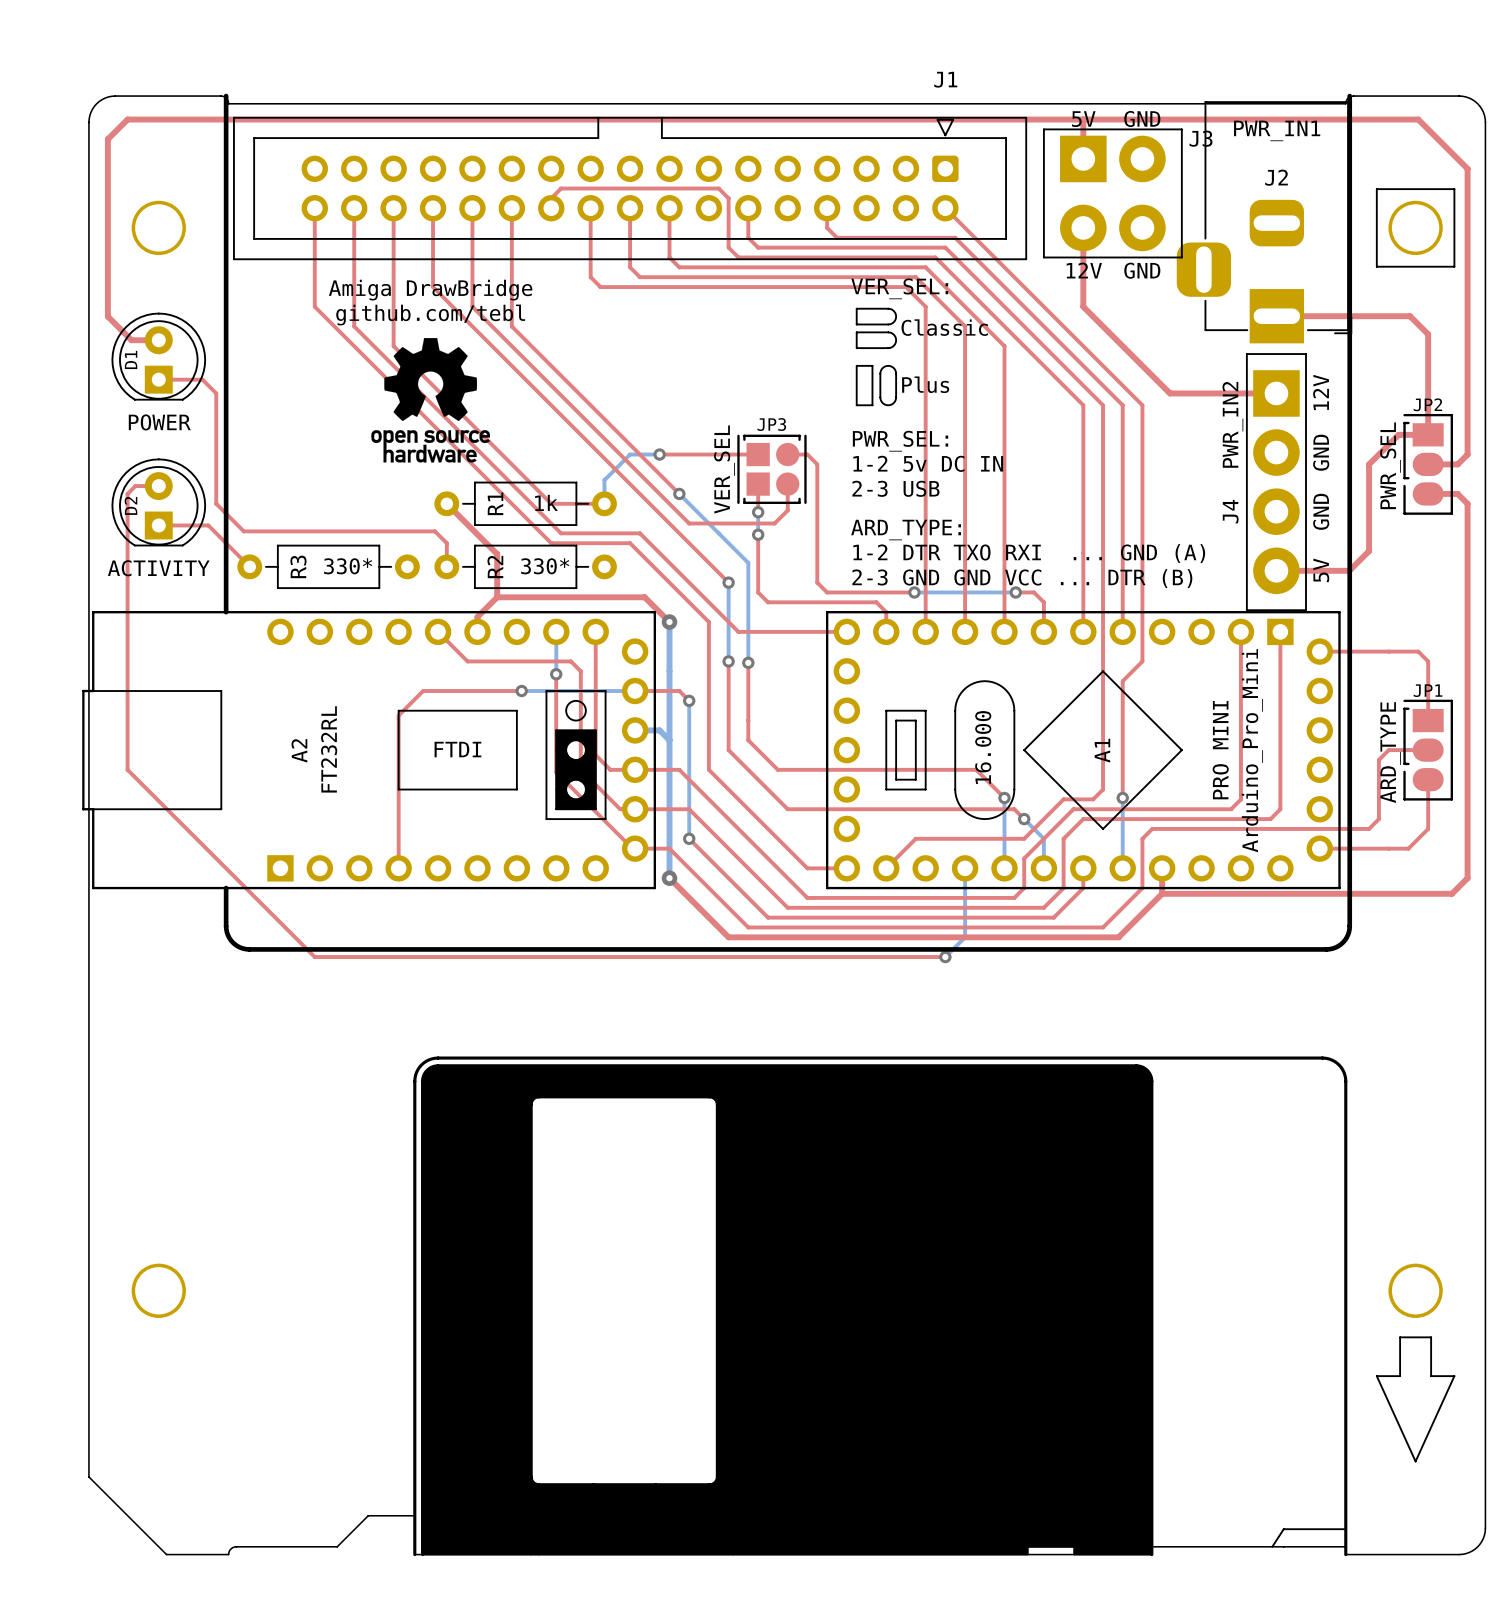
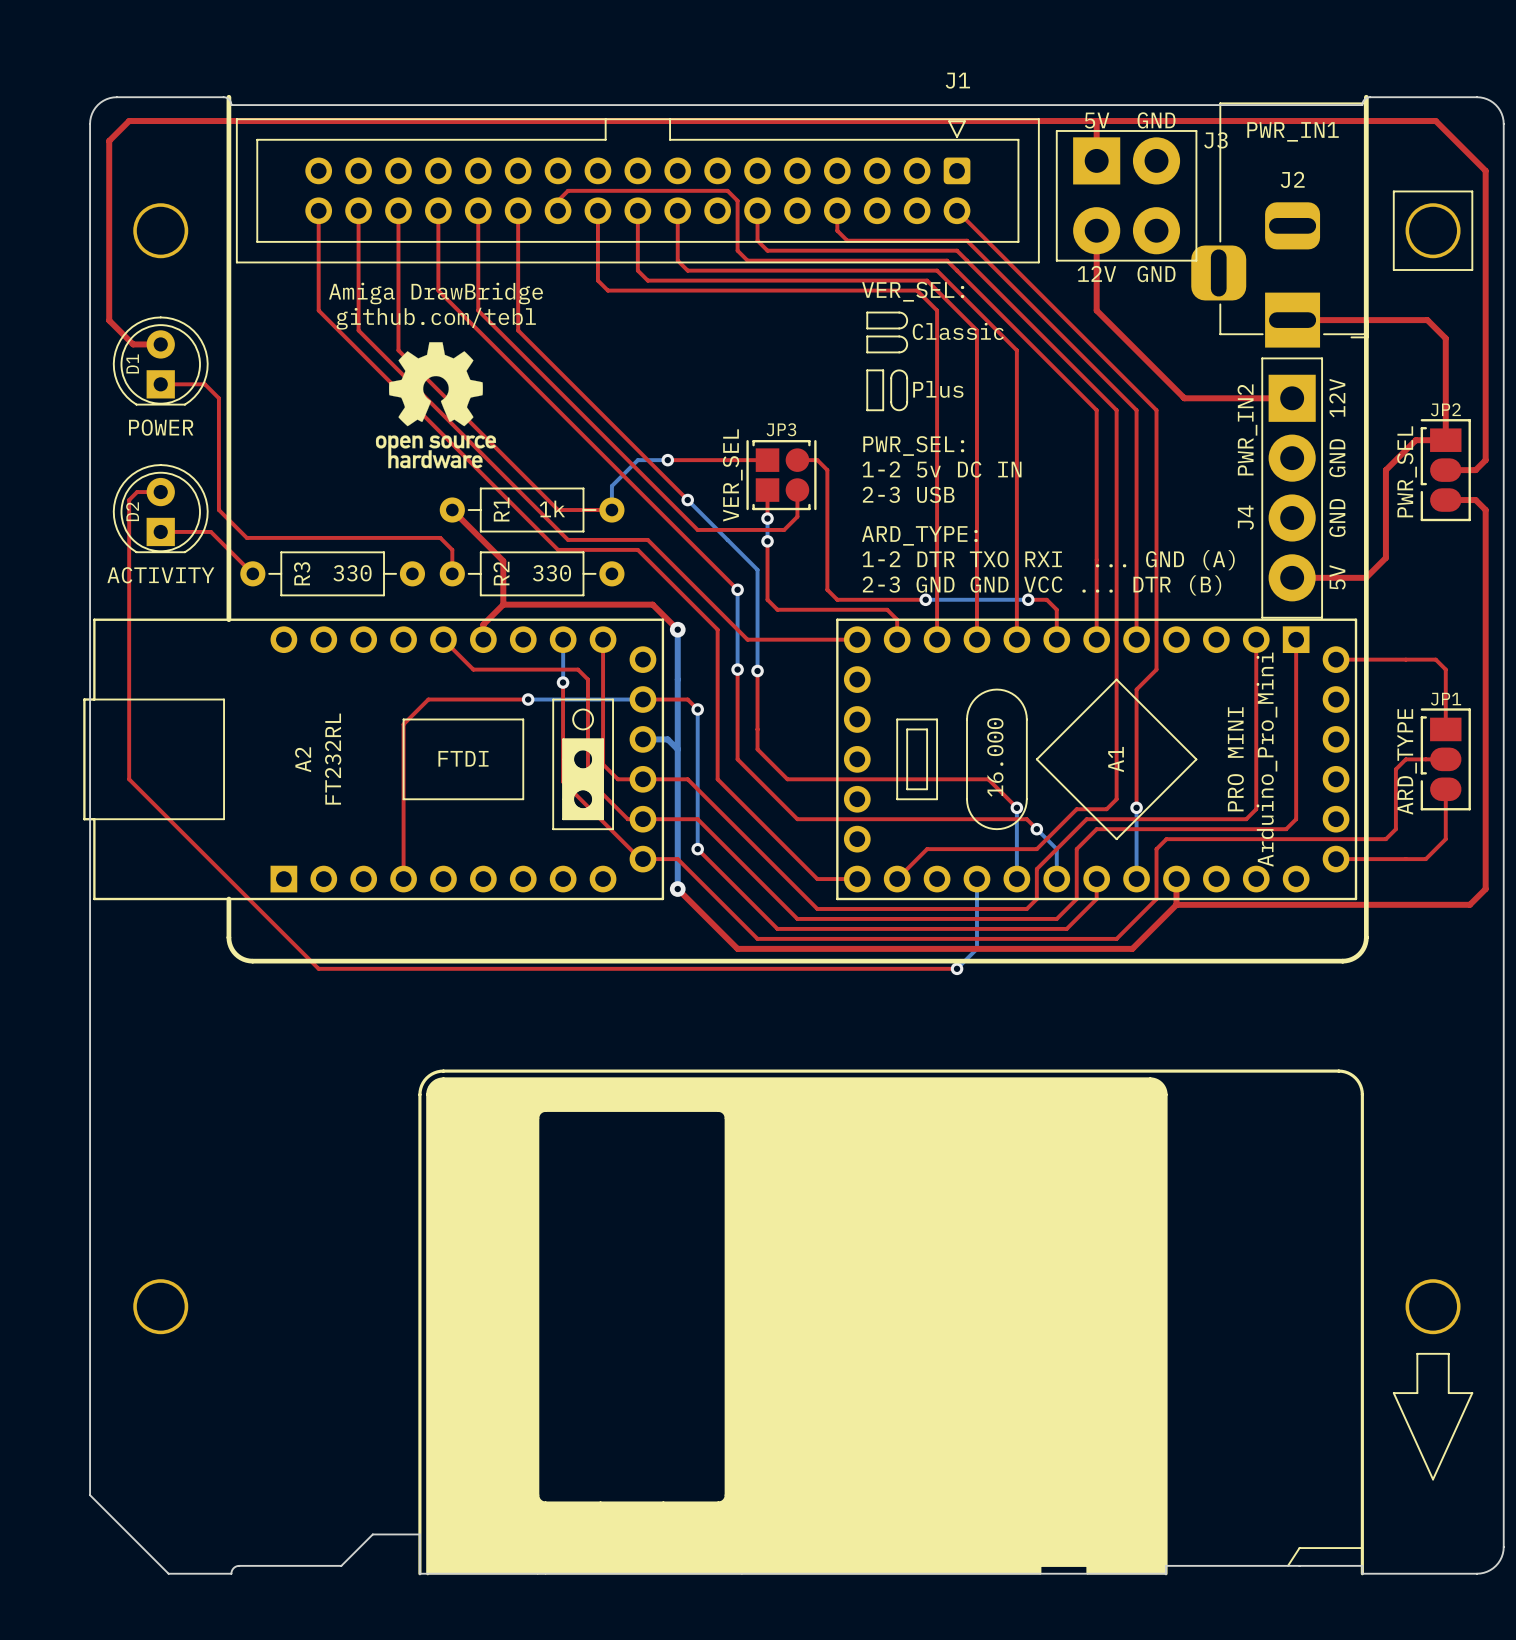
R3 value: 330* (348, 566) -> 330 (352, 573)
R2 value: 330* (545, 566) -> 330 (551, 573)

